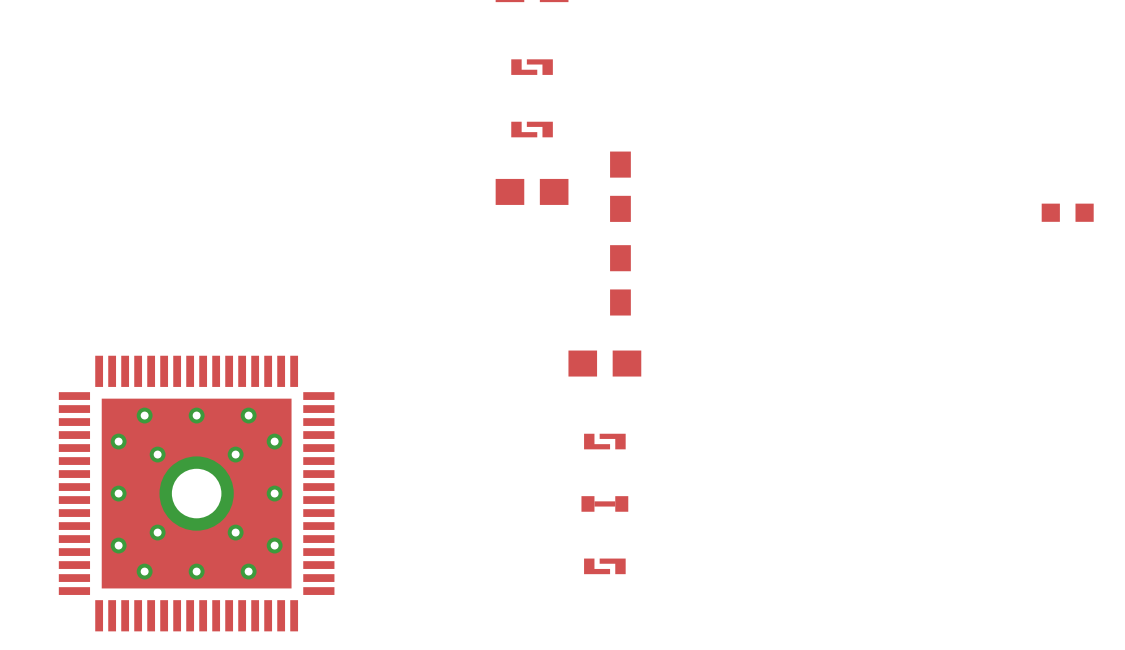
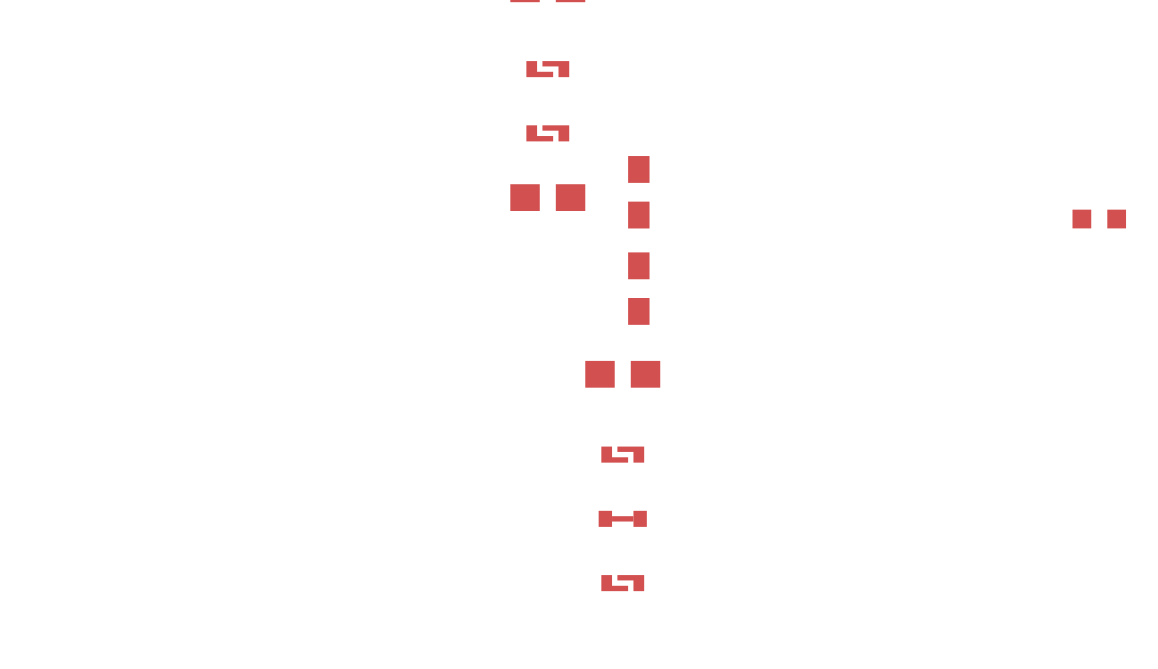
part: (196, 493) -> none

